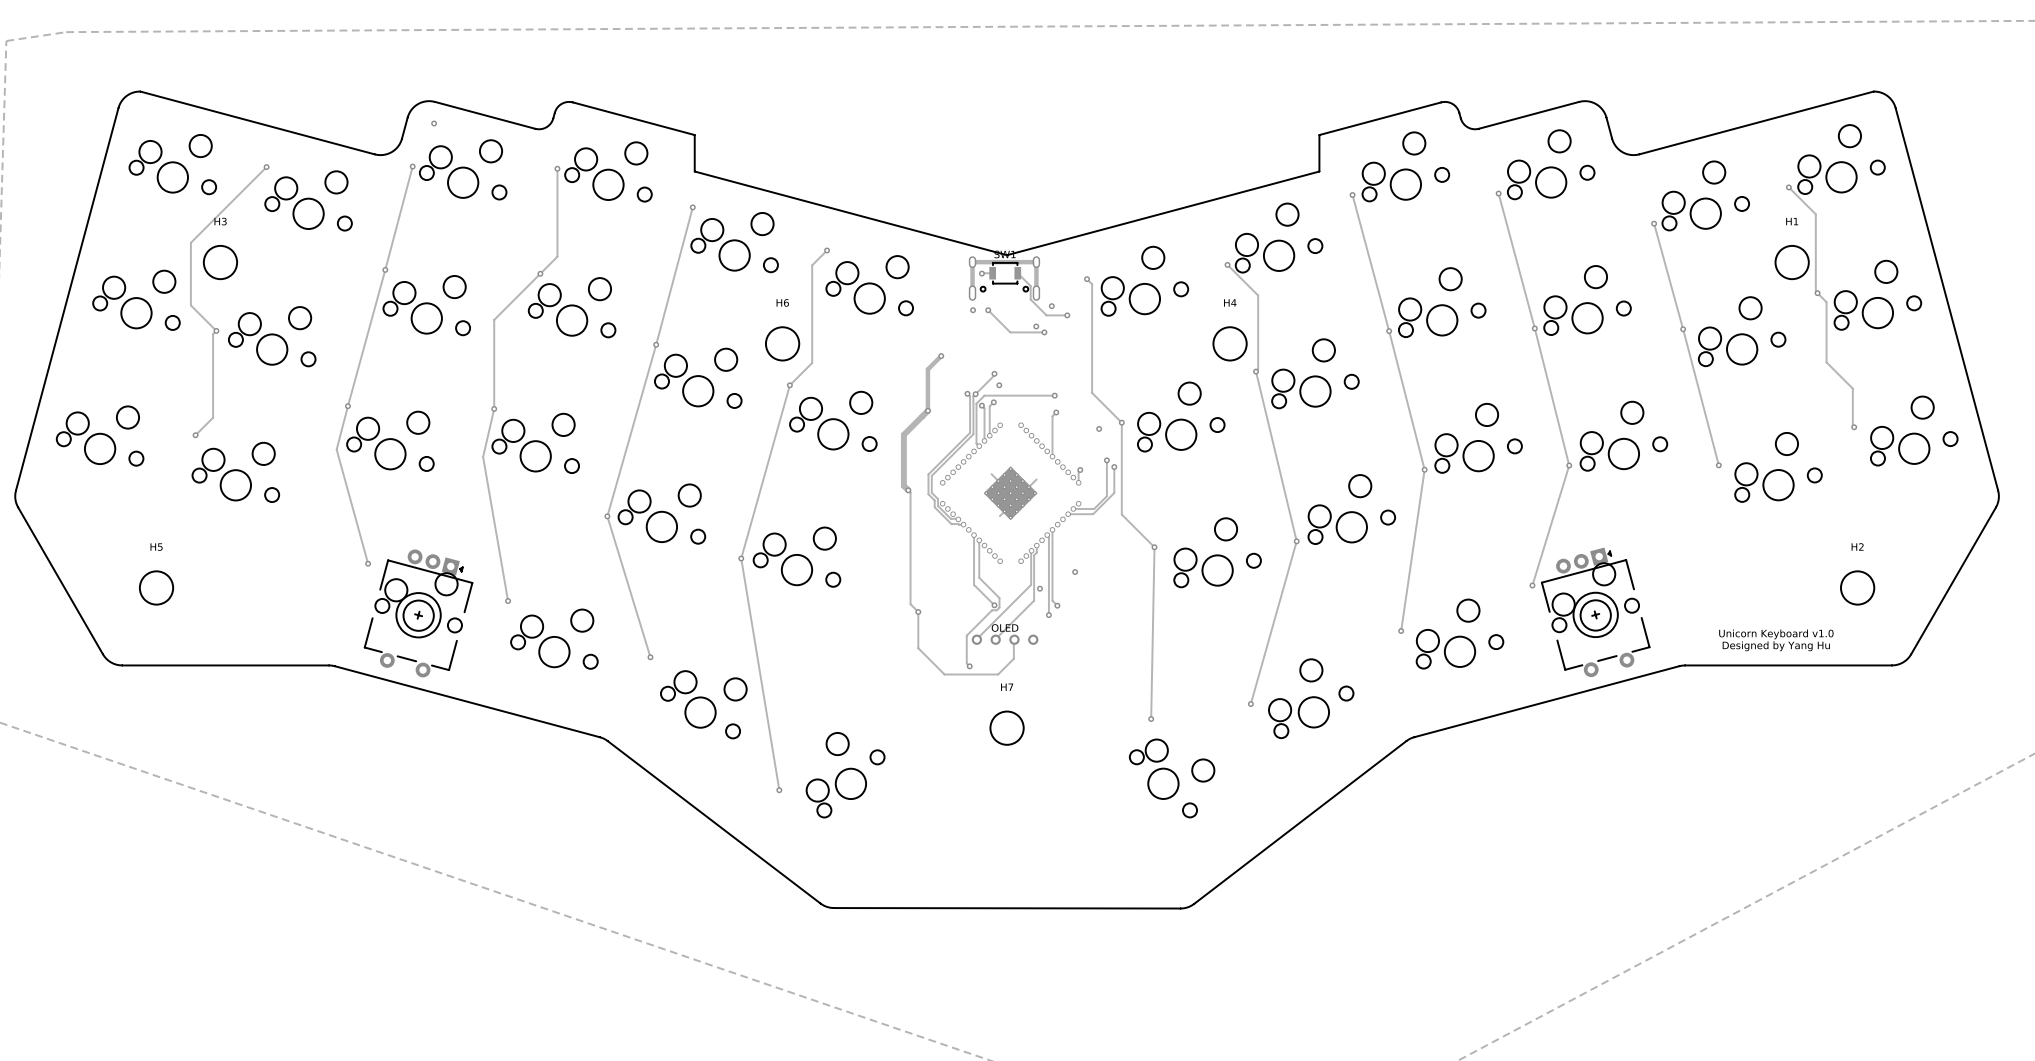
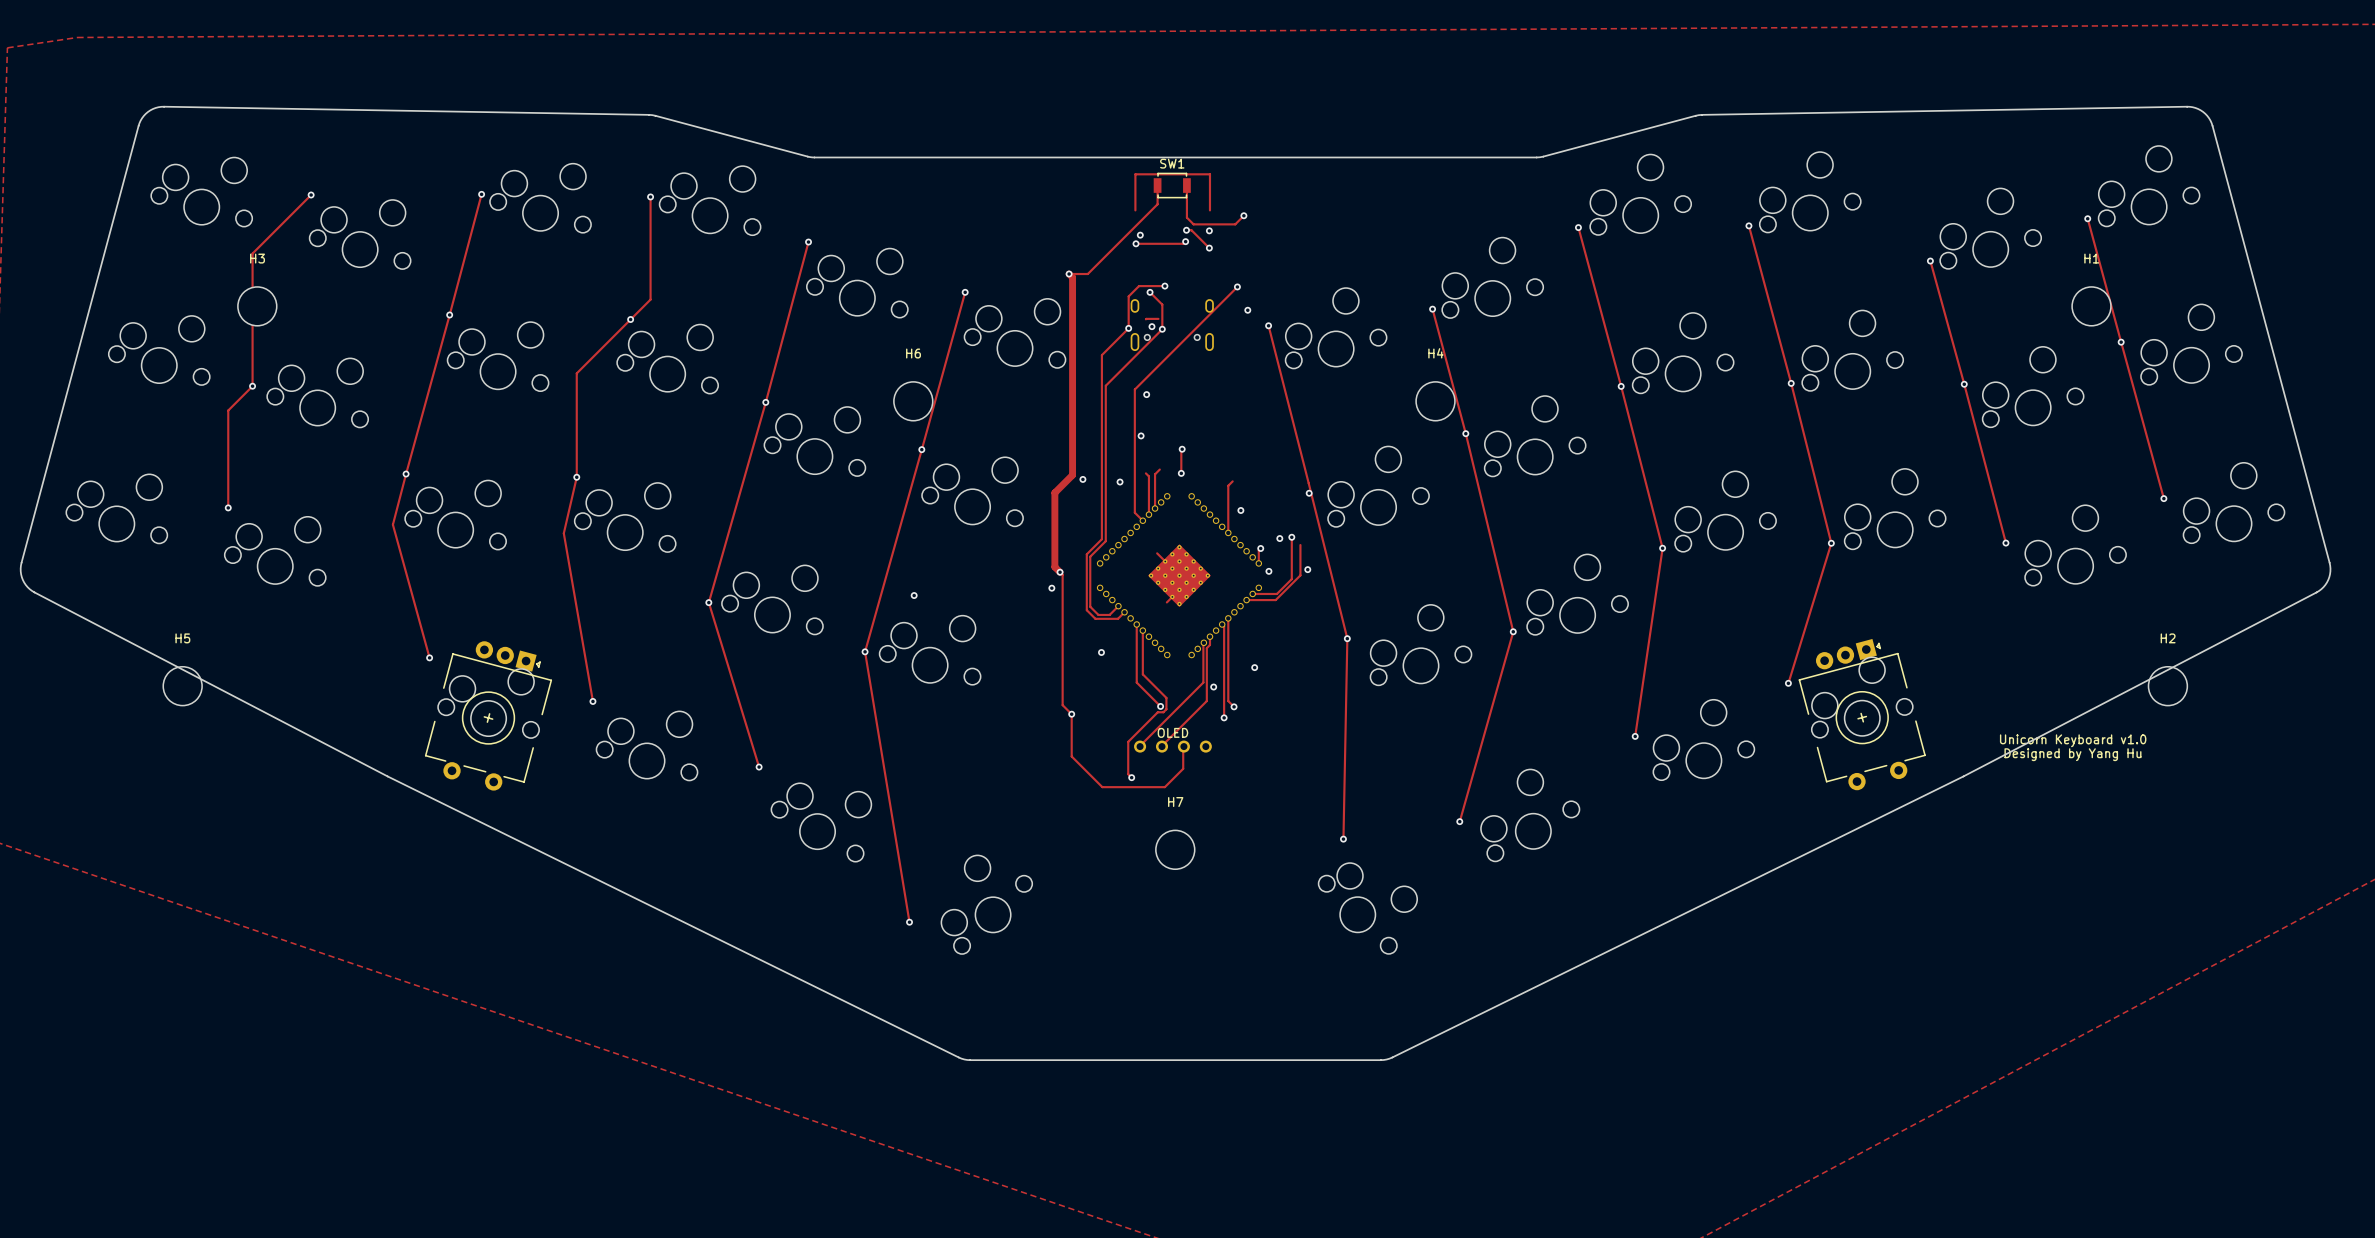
board edge: (1441, 102) (1454, 104) (1463, 123) (1475, 129) (1579, 101) (1590, 101) (1598, 105) (1604, 112) (1615, 146) (1625, 153) (1633, 155) (1873, 91) (1883, 93) (1891, 99) (1895, 107) (1998, 494) (1995, 507) (1911, 654) (1905, 660) (1891, 665) (1682, 665) (1412, 737) (1194, 903) (1185, 908) (831, 907) (820, 903) (602, 737) (331, 665) (122, 665) (111, 662) (102, 654) (15, 501) (15, 490) (118, 107) (123, 99) (133, 92) (140, 91) (380, 155) (391, 152) (398, 146) (409, 112) (415, 105) (423, 101) (434, 101) (538, 129) (550, 124) (560, 104) (571, 102) (694, 135) (694, 171) (1007, 255) (1319, 171) (1319, 135) (1322, 134) -> (1681, 119) (1702, 114) (2187, 106) (2203, 111) (2212, 125) (2329, 562) (2329, 577) (2323, 587) (2316, 592) (1963, 776) (1386, 1059) (961, 1058) (387, 776) (34, 592) (25, 584) (21, 577) (21, 562) (138, 125) (145, 113) (155, 107) (649, 114) (812, 157) (1543, 156)
via: (434, 123) -> none
track: none -> (1186, 185) (1186, 217) (1193, 224) (1235, 224) (1243, 215)
via: none -> (1243, 215)
track: (1788, 187) (1815, 214) (1815, 291) (1826, 302) (1826, 362) (1852, 388) (1854, 427) -> (2087, 218) (2163, 498)
track: none -> (1186, 230) (1191, 230) (1209, 248)
via: none -> (1186, 230)
via: none -> (1209, 230)
via: none -> (1140, 235)
track: none -> (1185, 241) (1183, 243) (1136, 243)
via: none -> (1185, 241)
via: none -> (1136, 243)
via: none -> (1209, 248)
track: (216, 217) (190, 242) (190, 305) (216, 330) -> (252, 253) (252, 386)
via: none -> (1069, 274)
via: none -> (1164, 286)
via: none -> (1237, 286)
track: (827, 250) (812, 265) (812, 362) (789, 385) -> (965, 292) (921, 449)
via: none -> (1150, 292)
track: (1227, 264) (1258, 295) (1258, 369) (1256, 371) -> (1432, 309) (1465, 433)
via: none -> (1247, 310)
via: (981, 273) -> none
SW1 position: (1005, 273) -> (1172, 185)
track: (1018, 273) (1030, 286) (1030, 299) (1046, 315) (1067, 315) -> none
via: none -> (1151, 326)
track: (1087, 279) (1092, 284) (1092, 392) (1121, 422) (1121, 514) (1154, 547) -> (1268, 325) (1347, 638)
via: none -> (1128, 328)
via: none -> (1162, 329)
track: (972, 293) (972, 262) (1036, 262) (1036, 293) -> (1135, 210) (1135, 174) (1209, 174) (1209, 210)
via: (1051, 306) -> none
via: (973, 310) -> none
track: (988, 310) (1010, 332) (1044, 332) -> none
via: (988, 310) -> none
via: (1067, 315) -> none
via: (1036, 326) -> none
via: (1044, 332) -> none
track: (213, 334) (213, 417) (195, 435) -> (248, 390) (228, 410) (228, 507)
via: none -> (1146, 394)
track: (941, 356) (927, 369) (927, 410) (903, 434) -> (1157, 185) (1157, 204) (1087, 274) (1069, 274) (1072, 277) (1072, 475) (1054, 492) (1054, 507)
via: (941, 356) -> none
via: none -> (1141, 435)
track: (994, 373) (973, 396) (973, 434) (931, 475) (931, 492) (938, 499) (938, 505) (950, 518) (958, 519) -> (1150, 292) (1162, 304) (1162, 329) (1105, 385) (1105, 541) (1090, 556) (1090, 606) (1098, 614) (1109, 614) (1118, 606)
via: (994, 373) -> none
track: none -> (1182, 449) (1181, 473)
via: none -> (1182, 449)
via: (999, 385) -> none
track: (967, 393) (970, 396) (970, 432) (928, 474) (928, 494) (934, 500) (934, 507) (951, 524) (963, 524) -> (1164, 286) (1139, 286) (1128, 296) (1128, 328) (1101, 355) (1101, 539) (1086, 554) (1086, 610) (1095, 618) (1117, 618) (1124, 612)
via: (967, 393) -> none
via: (975, 394) -> none
track: (1054, 395) (984, 395) (976, 403) (976, 443) -> (1237, 286) (1134, 389) (1134, 512) (1139, 517)
via: (1054, 395) -> none
via: (993, 402) -> none
via: (981, 405) -> none
via: none -> (1181, 473)
via: (1056, 412) -> none
via: none -> (1120, 482)
via: (1099, 428) -> none
via: none -> (1240, 510)
via: none -> (1279, 538)
via: (1114, 467) -> none
track: (1036, 479) (1028, 487) -> none
via: none -> (1307, 569)
via: none -> (1268, 571)
via: none -> (1051, 588)
via: none -> (914, 595)
via: none -> (1101, 652)

